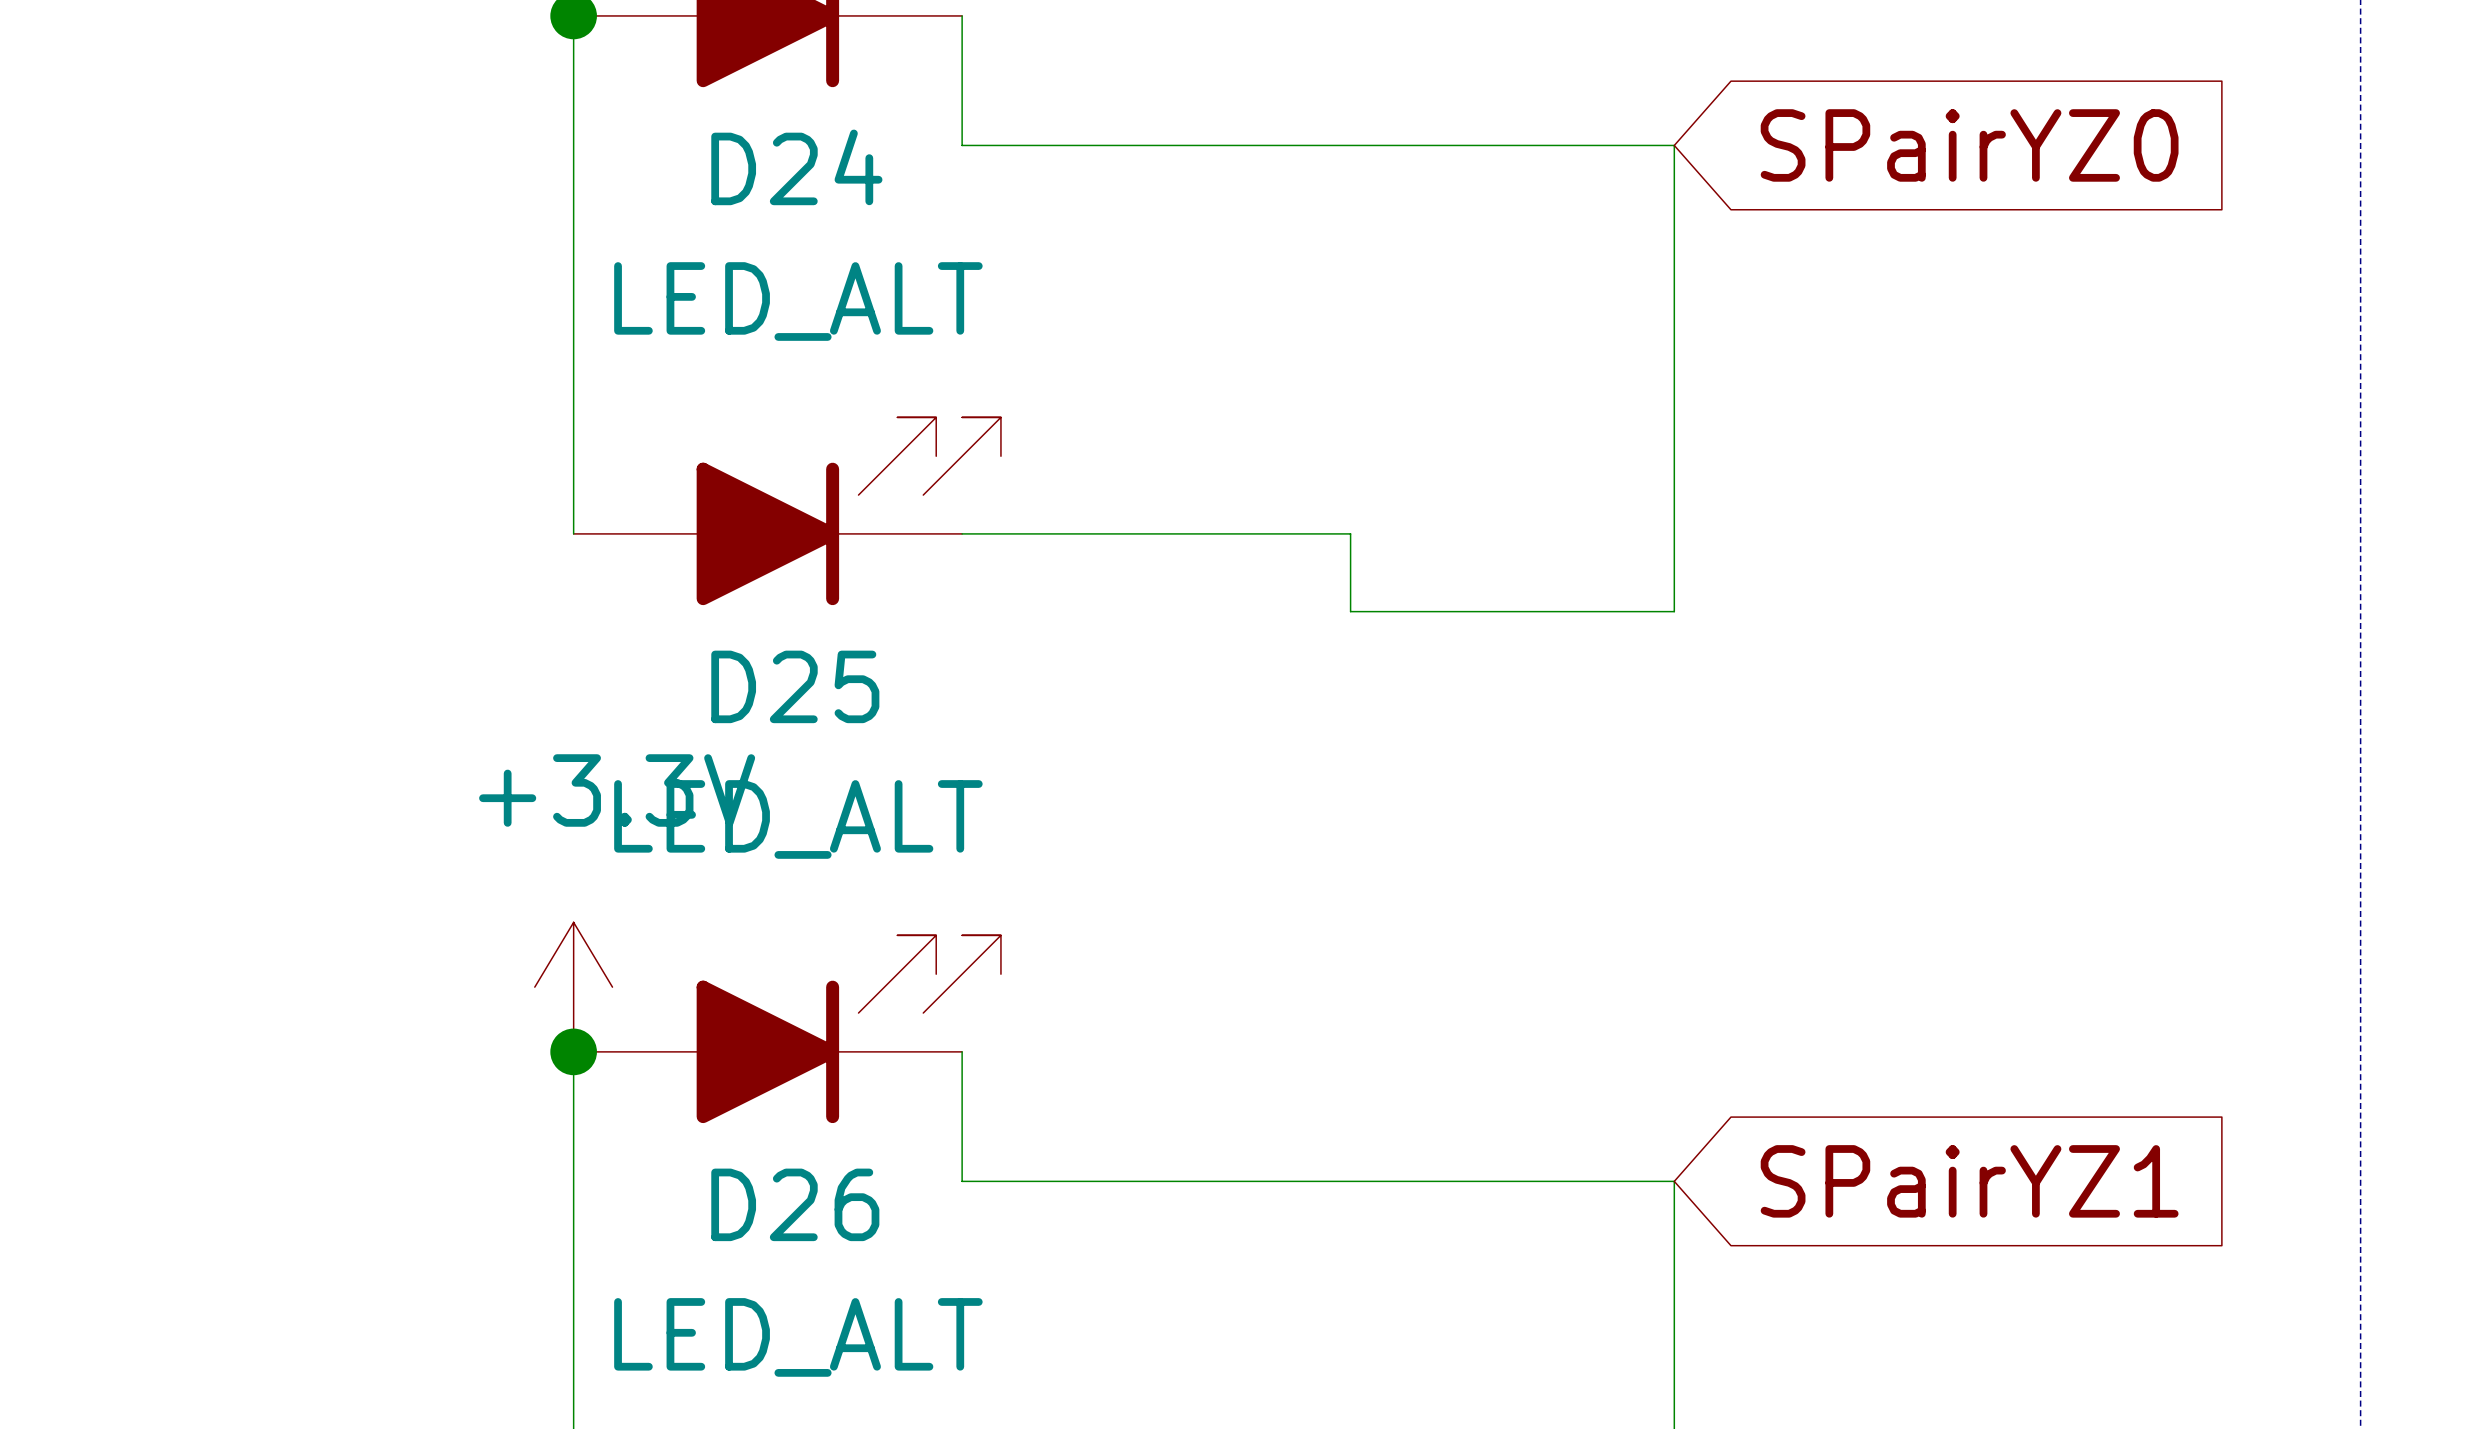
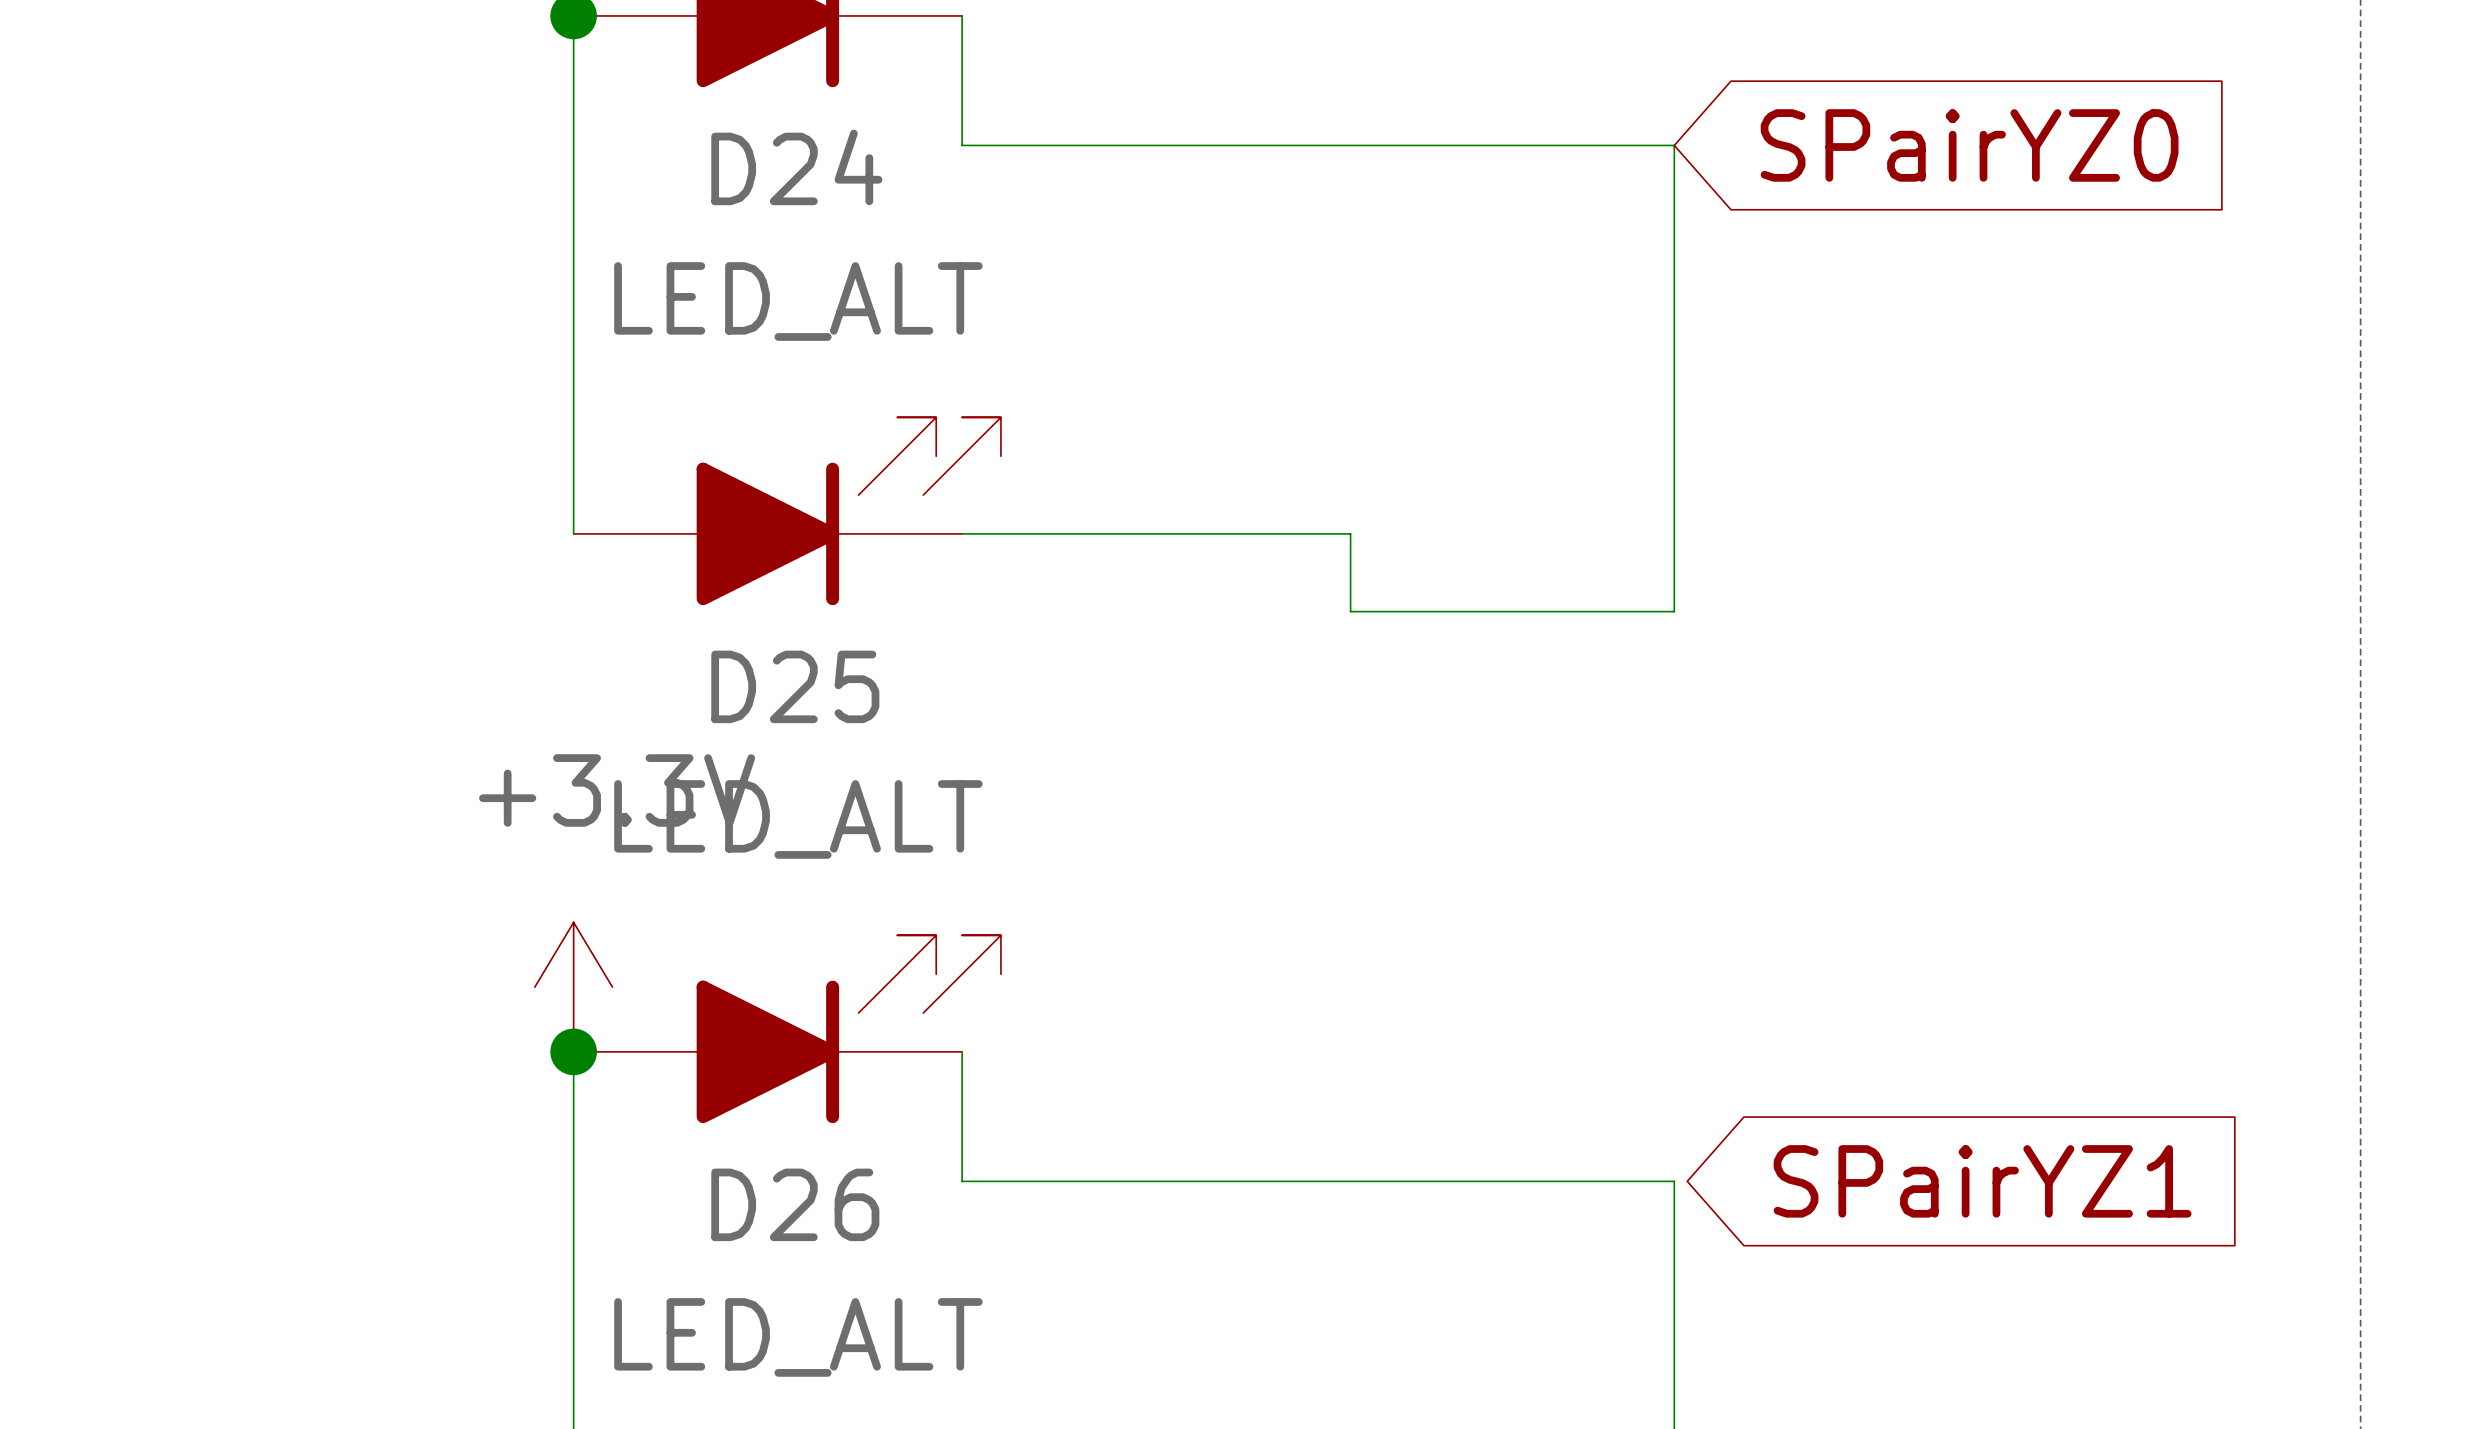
global label position: SPairYZ1 (1969, 1181) -> SPairYZ1 (1982, 1181)

